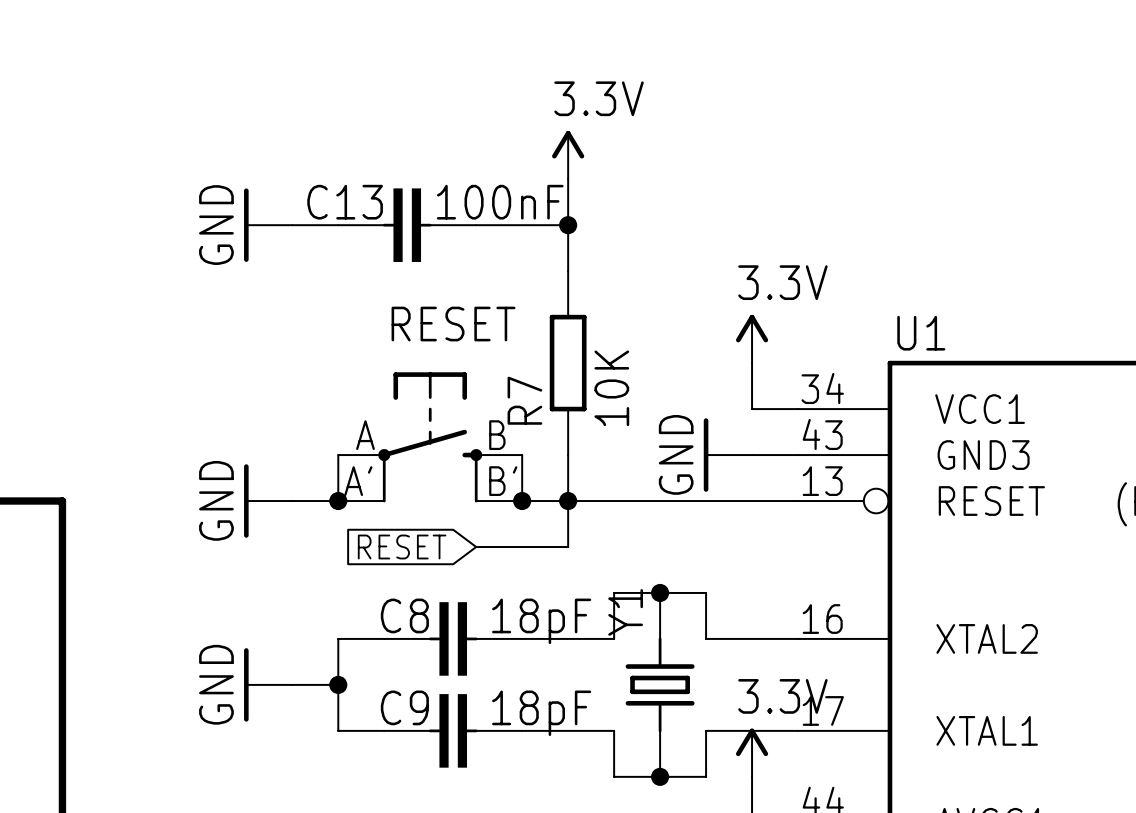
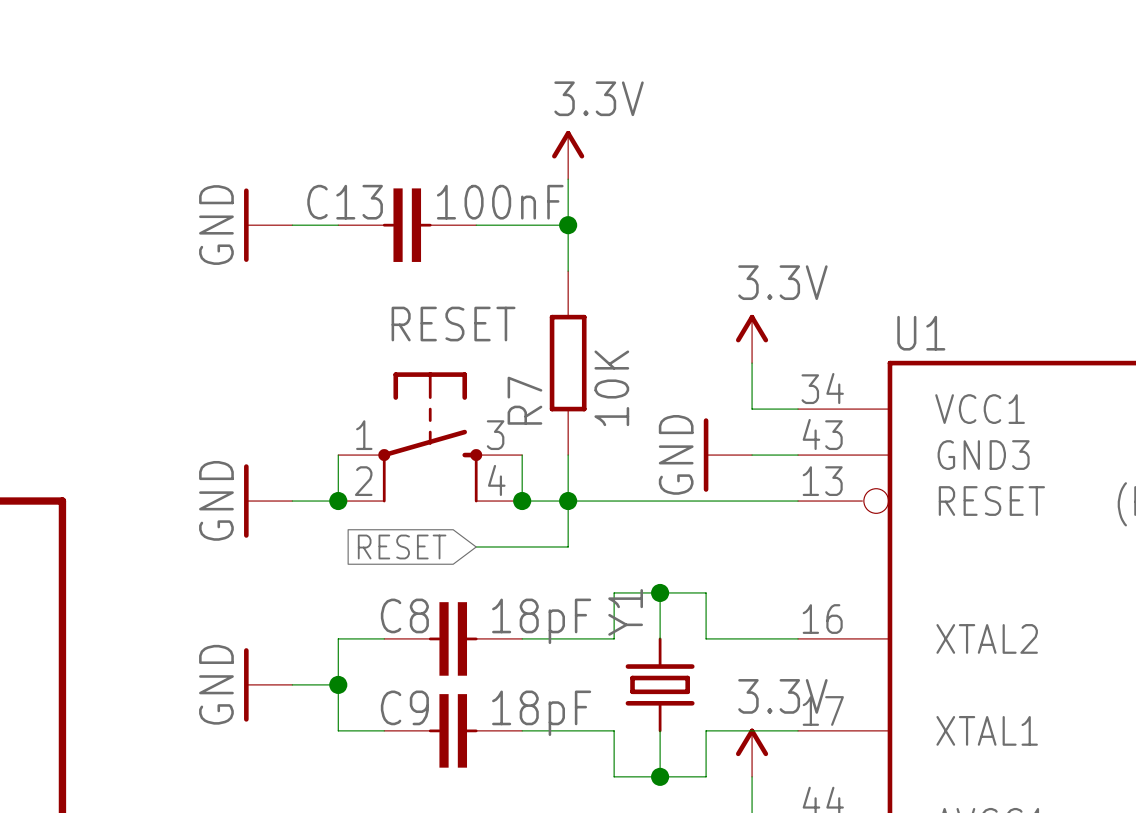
RESET pin number: A (365, 435) -> 1 (364, 435)
RESET pin number: B (497, 435) -> 3 (495, 435)
RESET pin number: A' (358, 481) -> 2 (363, 481)
RESET pin number: B' (503, 481) -> 4 (496, 480)

